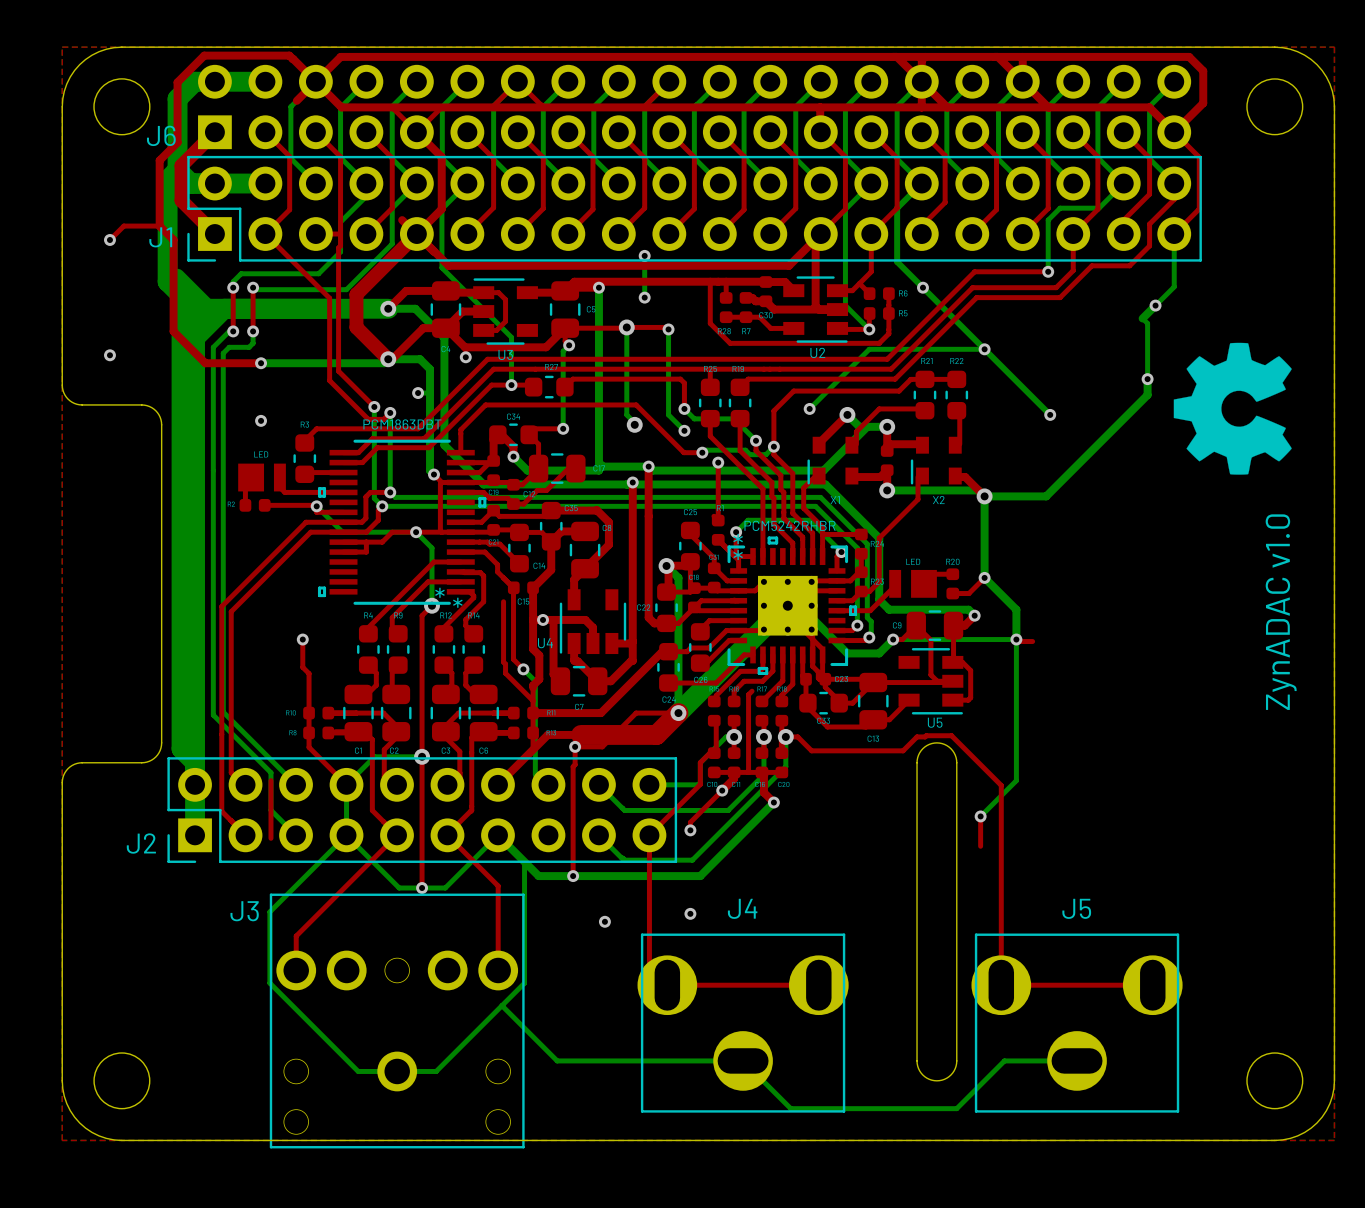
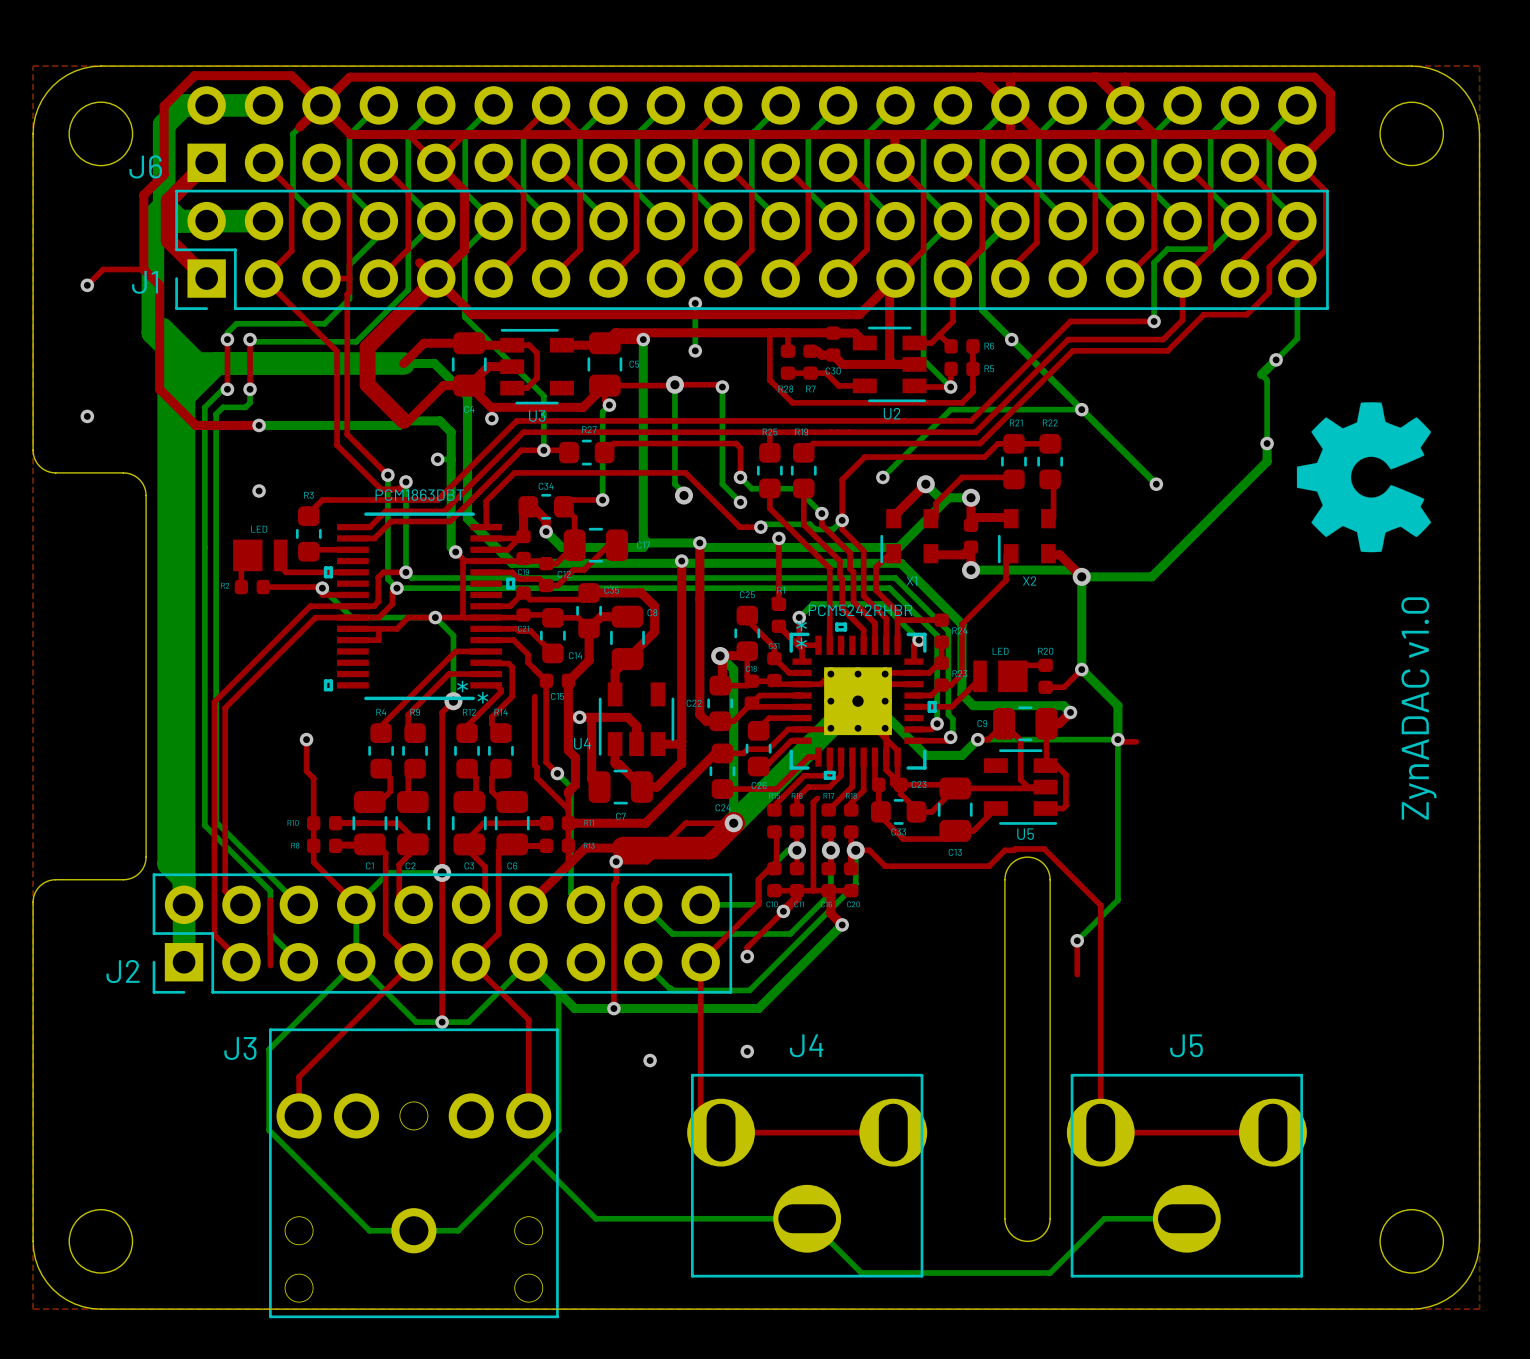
via: (388, 308) -> none
via: (388, 359) -> none

